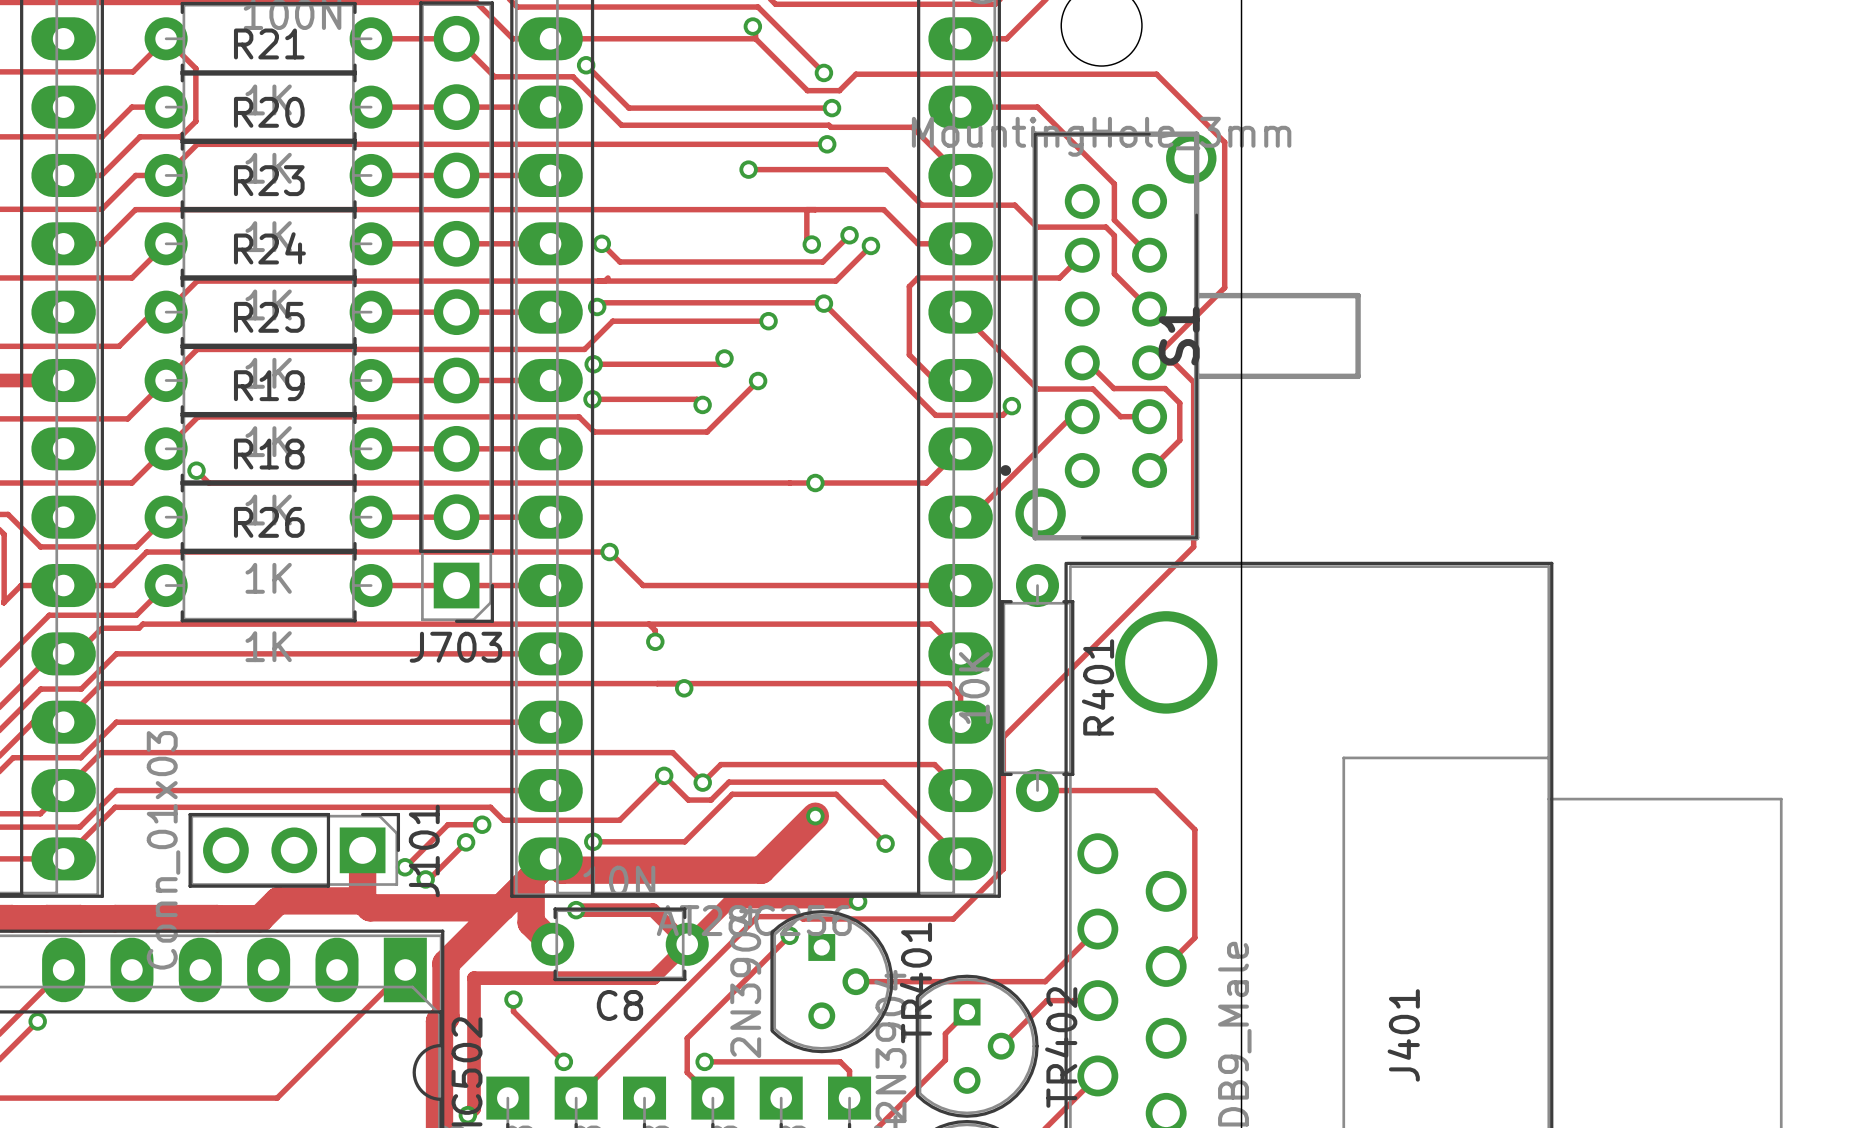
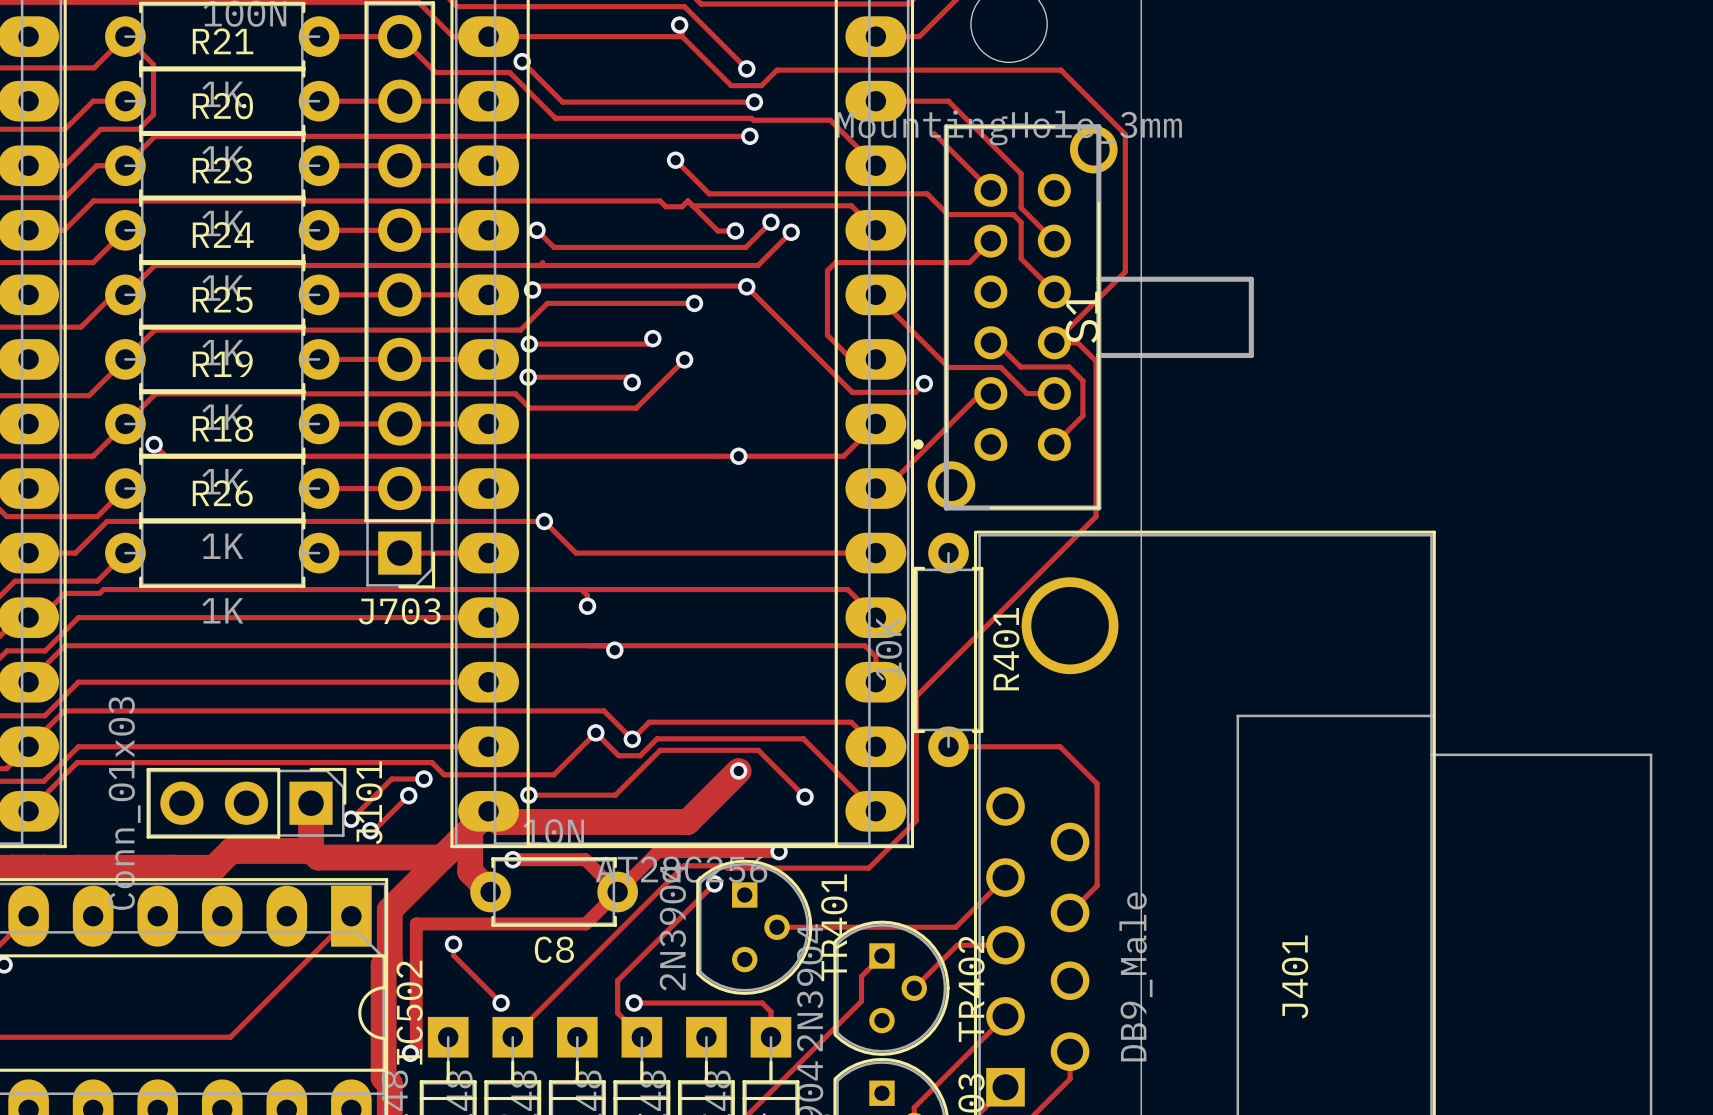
track: none -> (934, 133) (990, 190)
track: (748, 169) (886, 169) (921, 205) -> (675, 160) (709, 193) (839, 193)
track: (806, 209) (806, 239) (811, 244) -> none
track: (132, 212) (135, 209) (883, 209) (917, 243) (960, 243) -> (93, 200) (660, 200) (665, 206) (682, 206) (687, 200) (717, 231) (735, 231)
track: none -> (692, 205) (851, 205) (875, 230)

